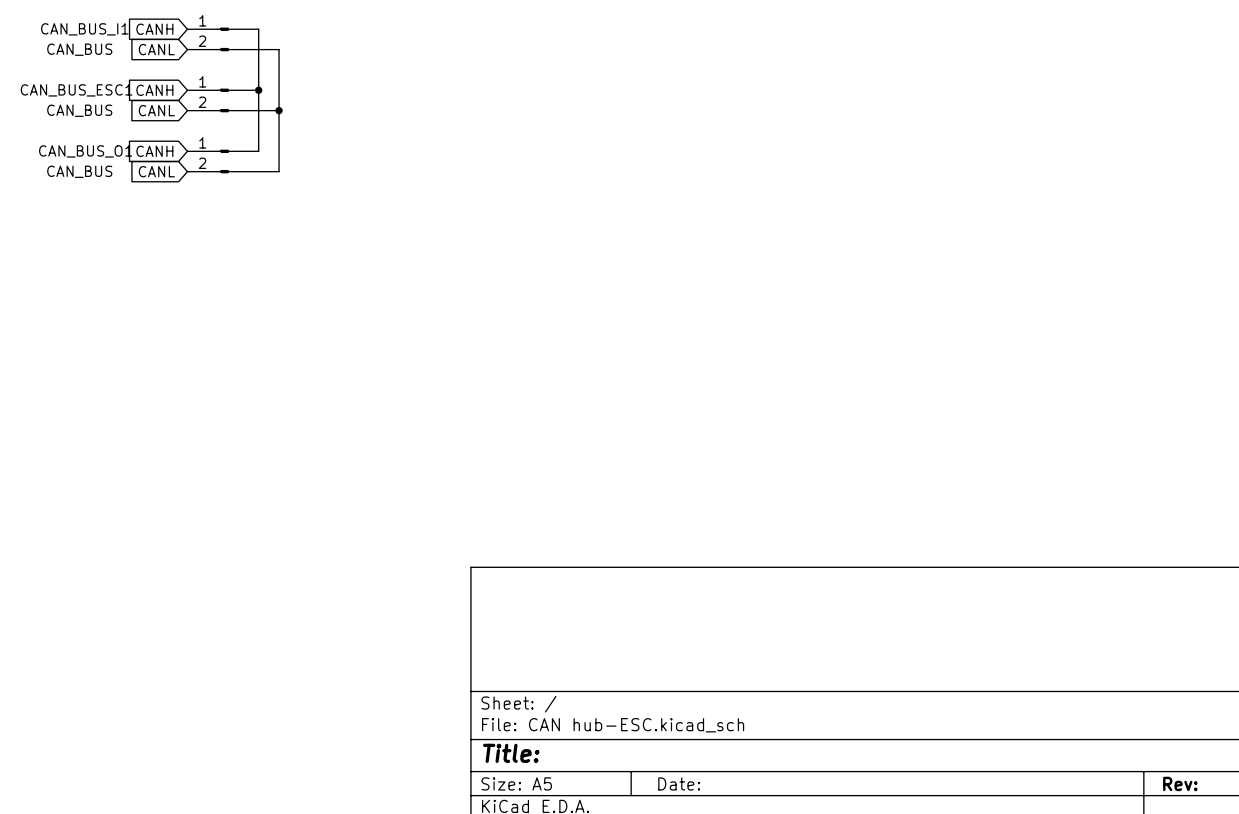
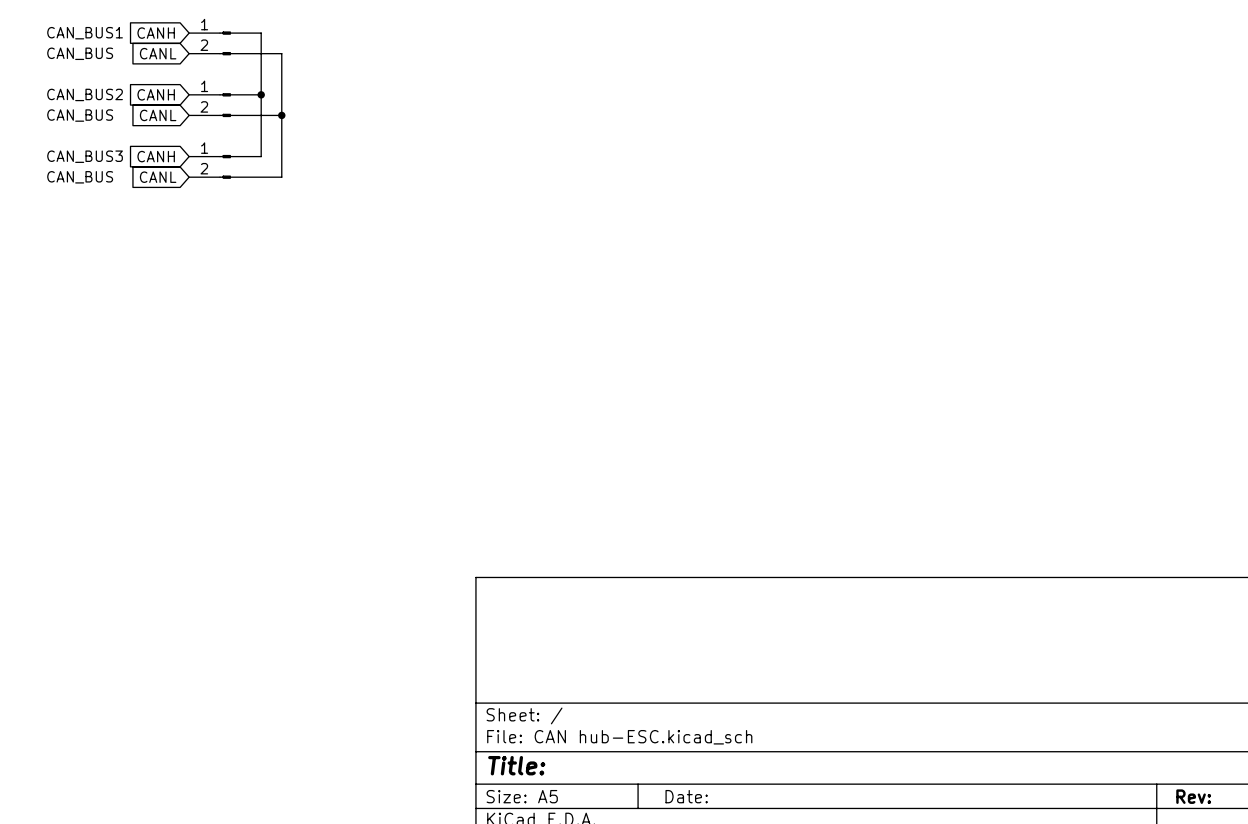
CAN_BUS_I1 name: CAN_BUS_I1 (84, 29) -> CAN_BUS1 (85, 33)
CAN_BUS_ESC1 name: CAN_BUS_ESC1 (76, 90) -> CAN_BUS2 (85, 94)
CAN_BUS_O1 name: CAN_BUS_O1 (85, 151) -> CAN_BUS3 (85, 156)

